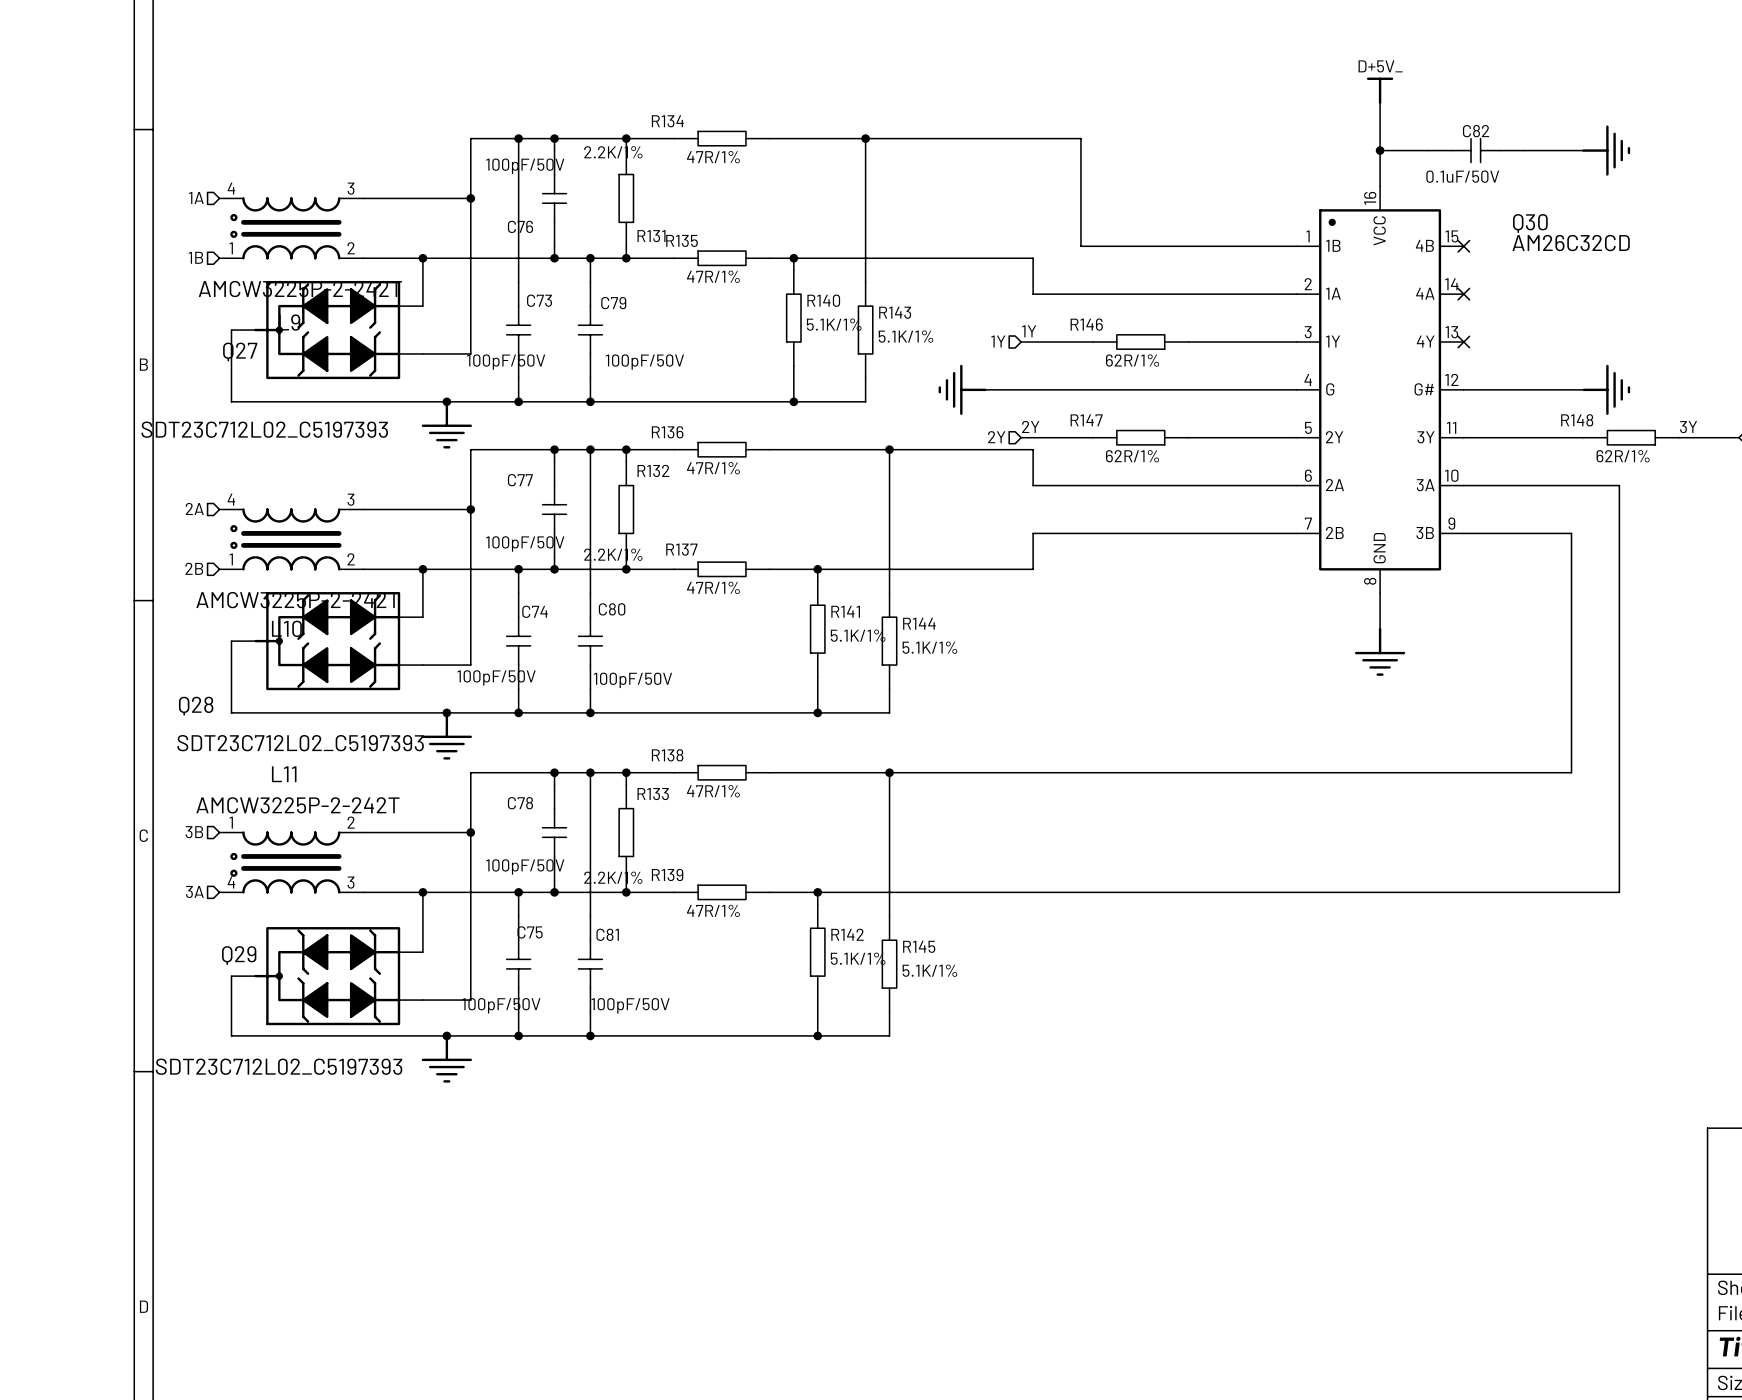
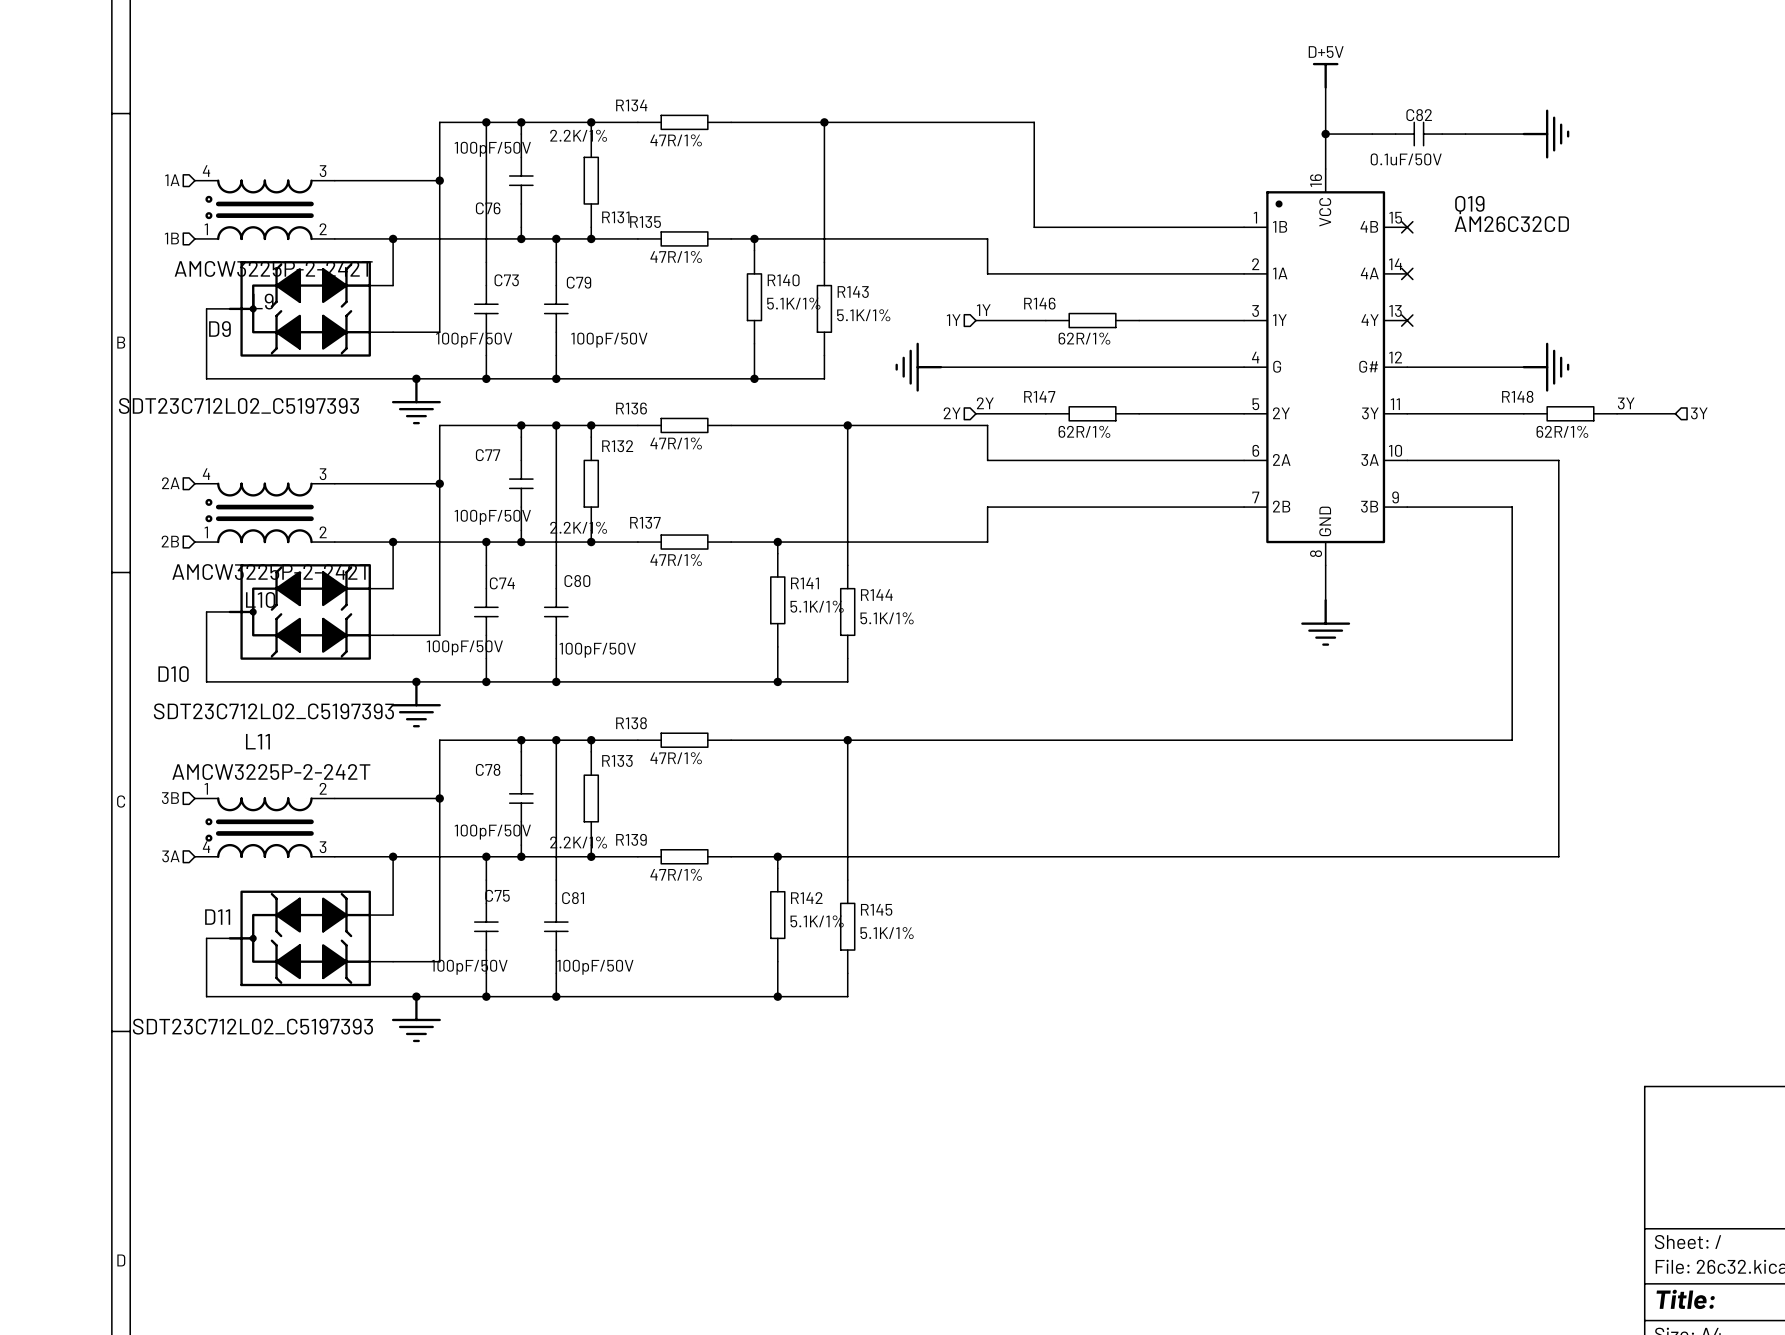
power symbol: D+5V_ (1380, 90) -> D+5V (1325, 75)
Q30 name: Q30 (1530, 223) -> Q19 (1469, 205)
Q27 name: Q27 (240, 351) -> D9 (219, 329)
Q28 name: Q28 (196, 706) -> D10 (173, 674)
Q29 name: Q29 (239, 955) -> D11 (217, 917)

